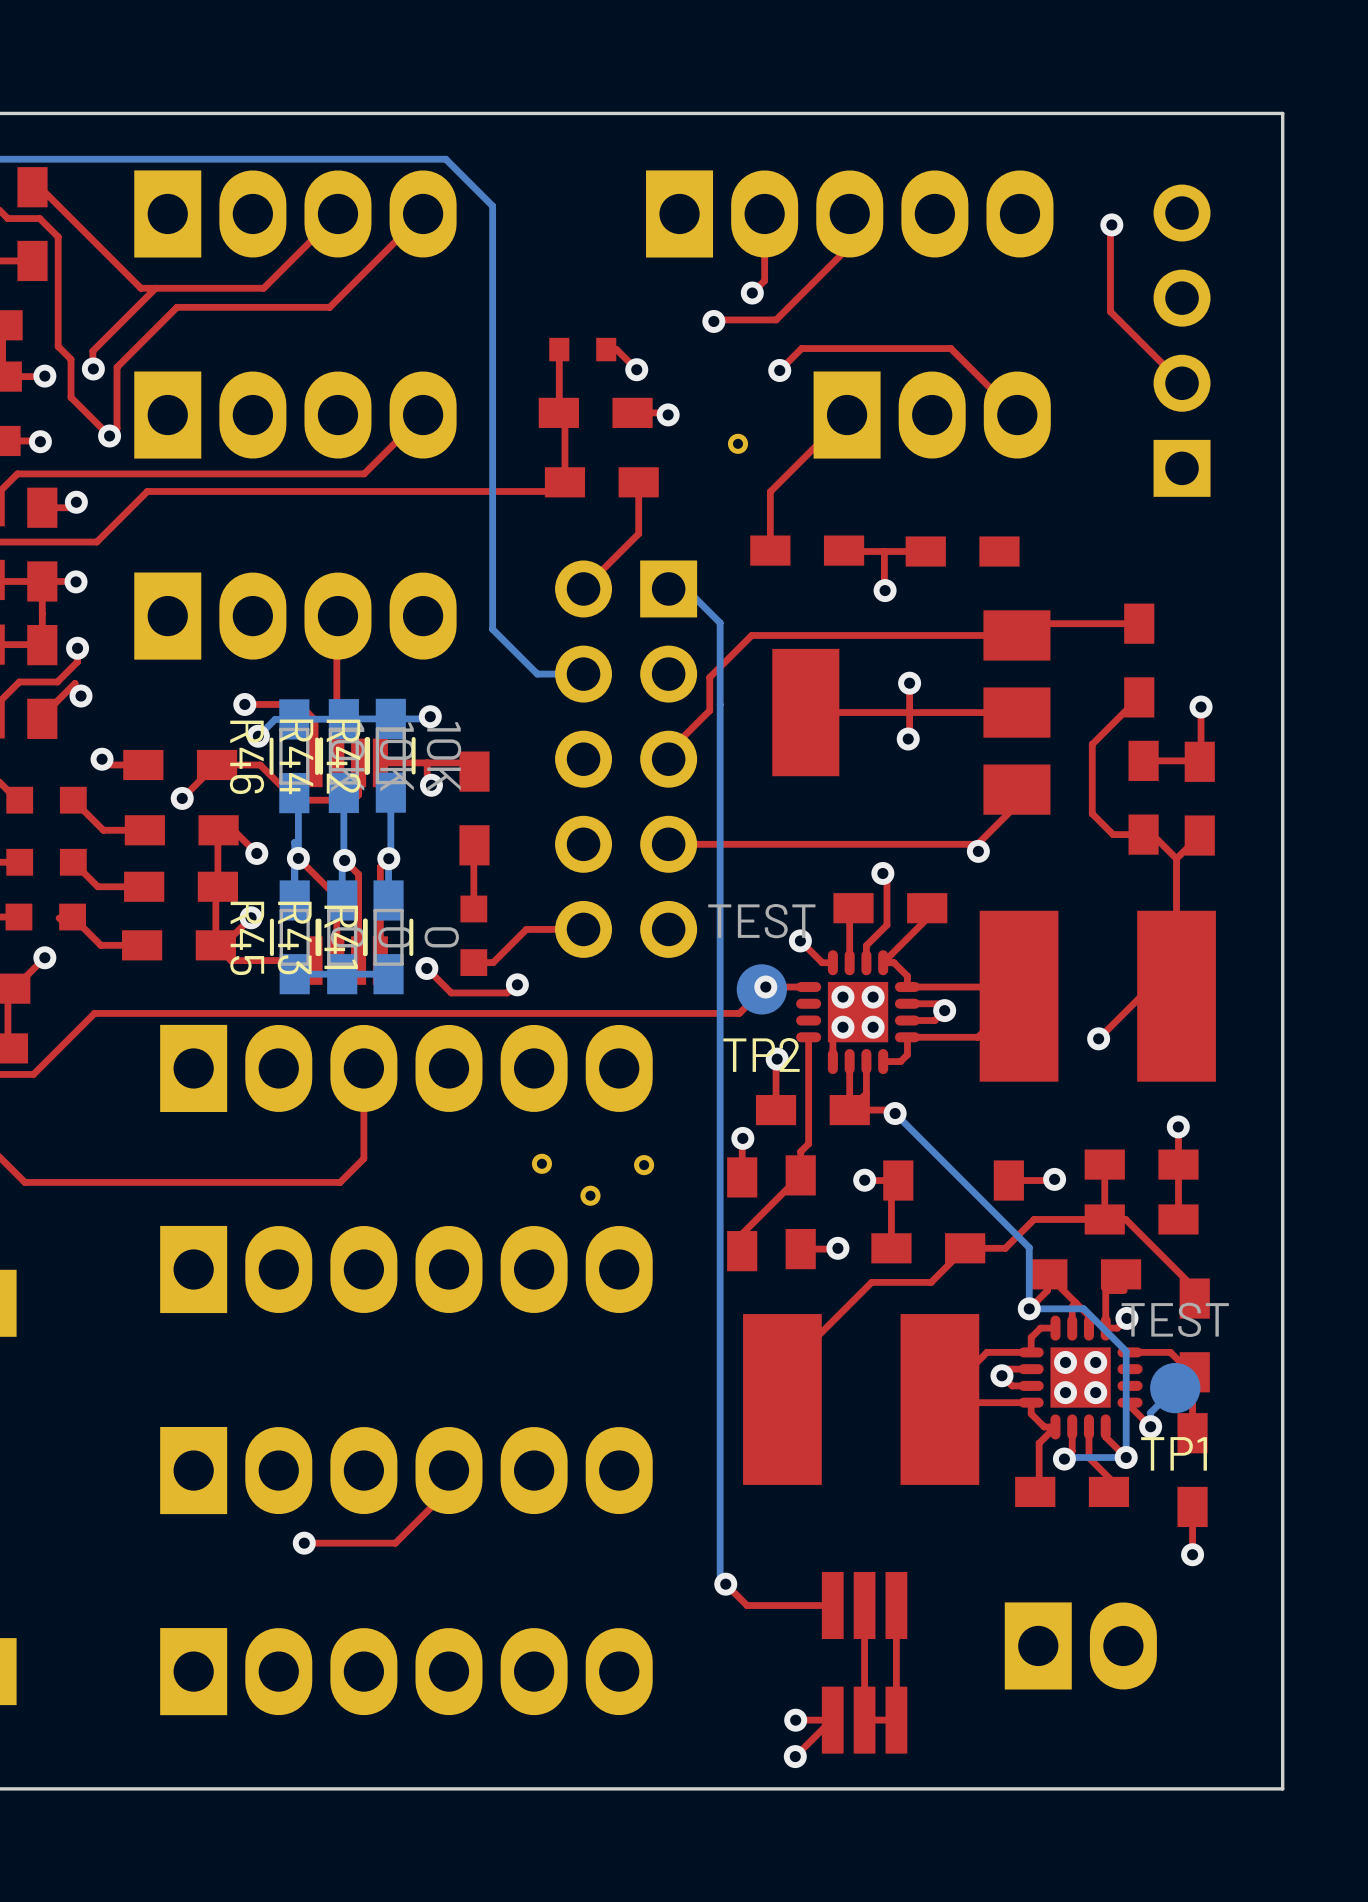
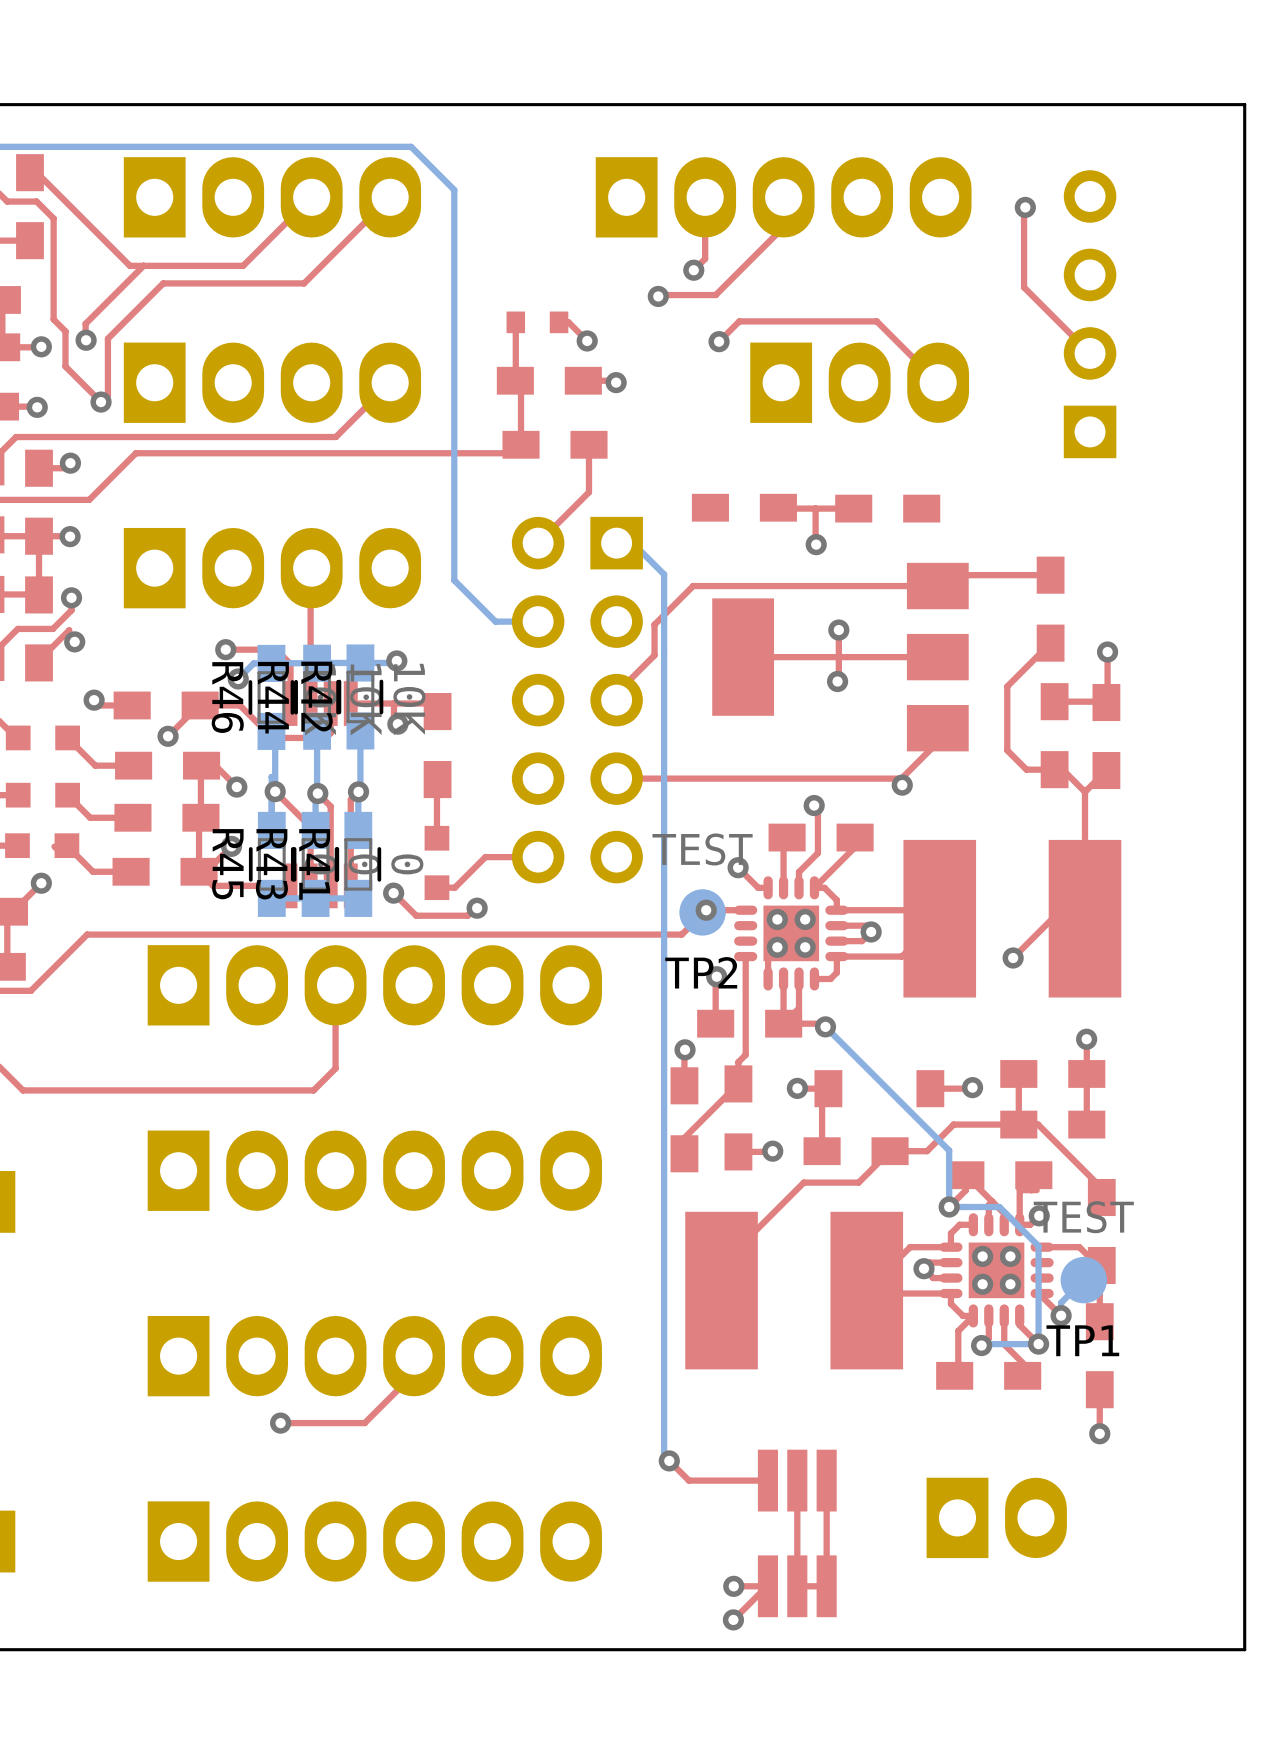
board edge: (1282, 113) (1282, 1788) -> (1182, 104) (1244, 104) (1244, 1649) (1182, 1649)
top track: (847, 415) (770, 491) (770, 550) -> none
part: (738, 443) -> none
part: (541, 1163) -> none
part: (644, 1165) -> none
part: (590, 1195) -> none

